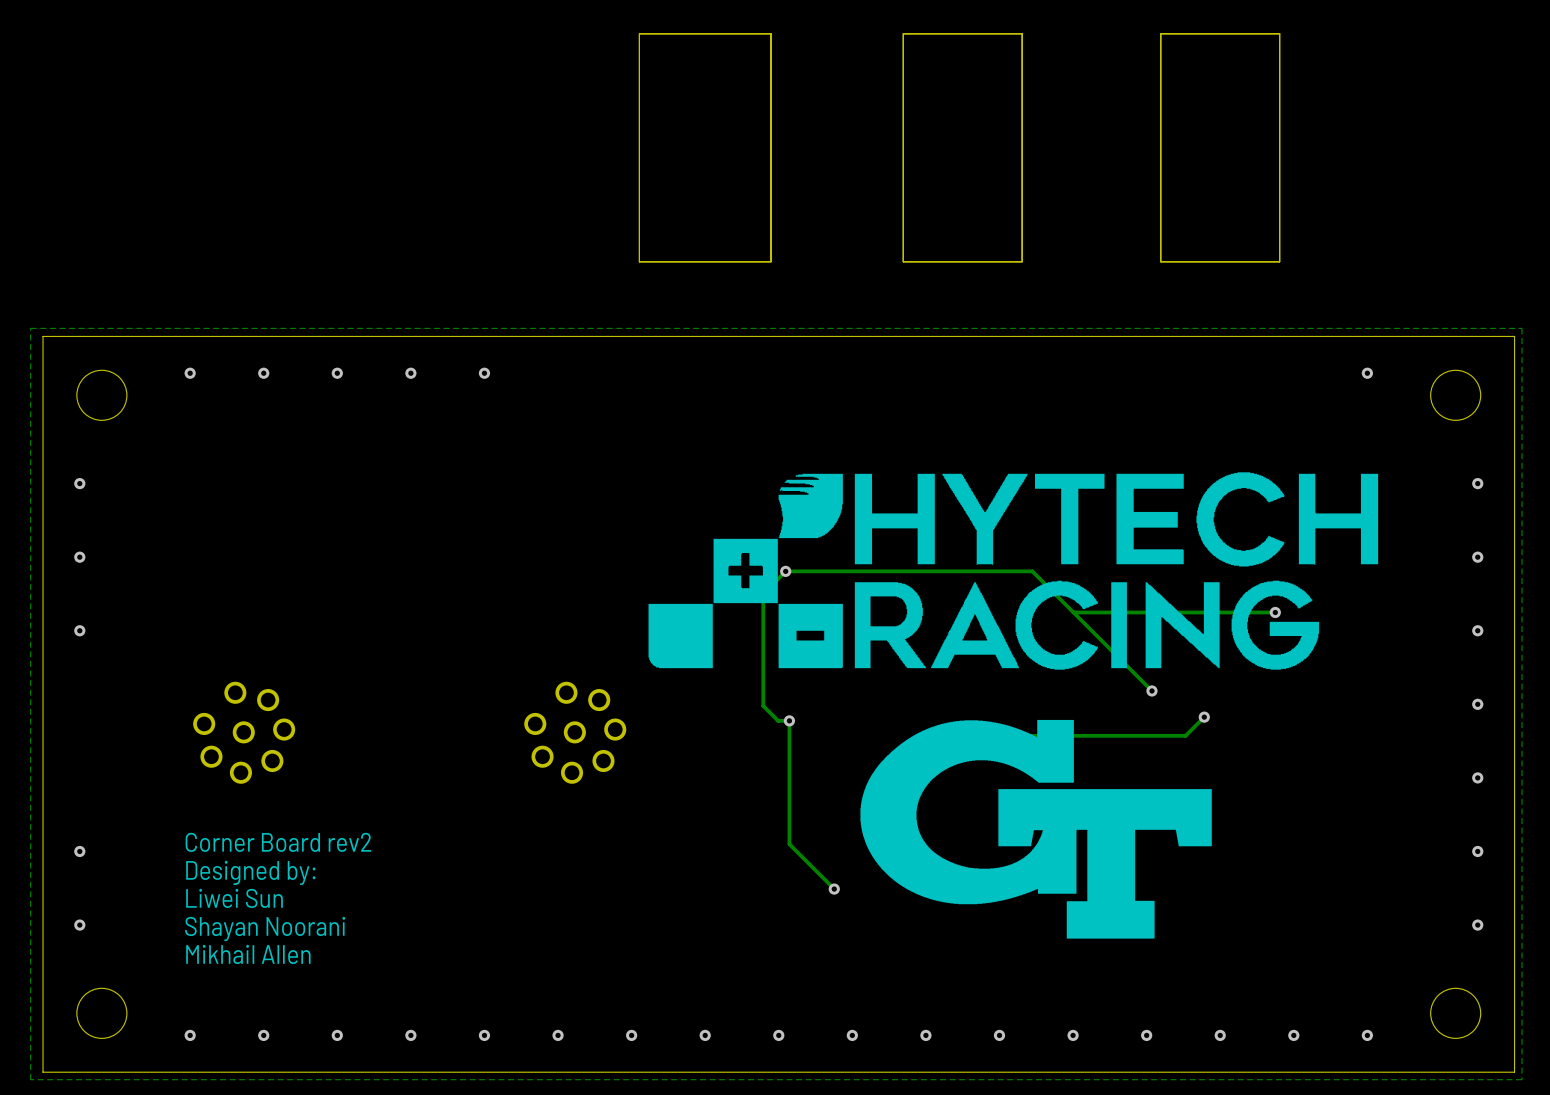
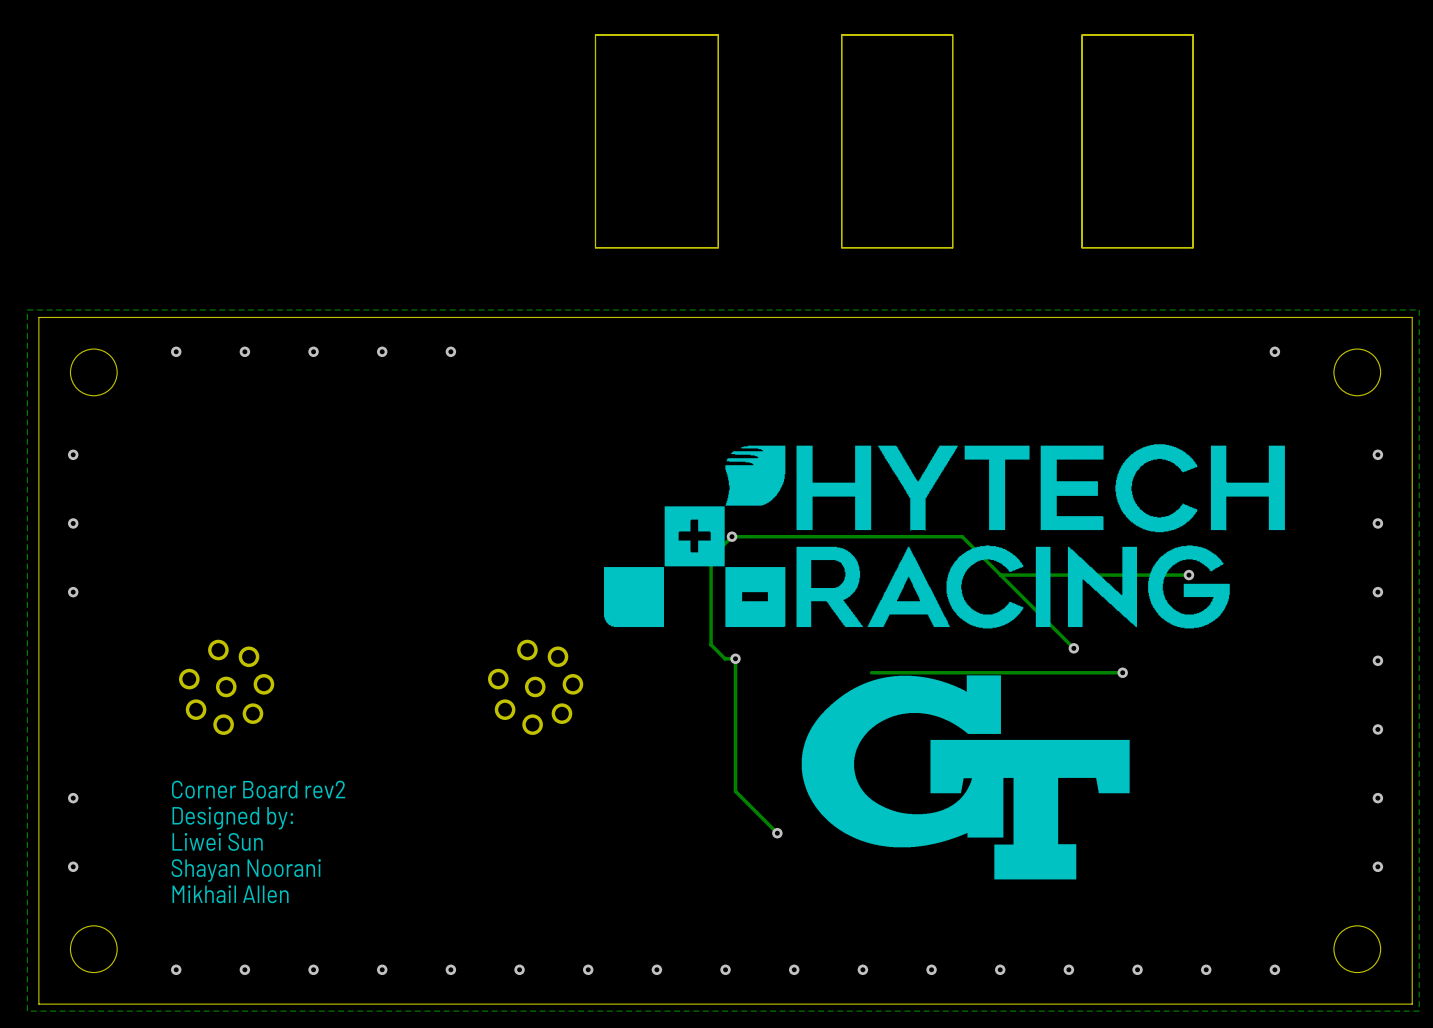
track: (763, 687) (763, 705) (778, 720) (789, 720) -> (711, 644) (725, 658) (735, 658) (735, 676)
track: (1204, 717) (1185, 735) (935, 735) -> (1122, 672) (871, 672)
via position: (789, 720) -> (735, 658)

